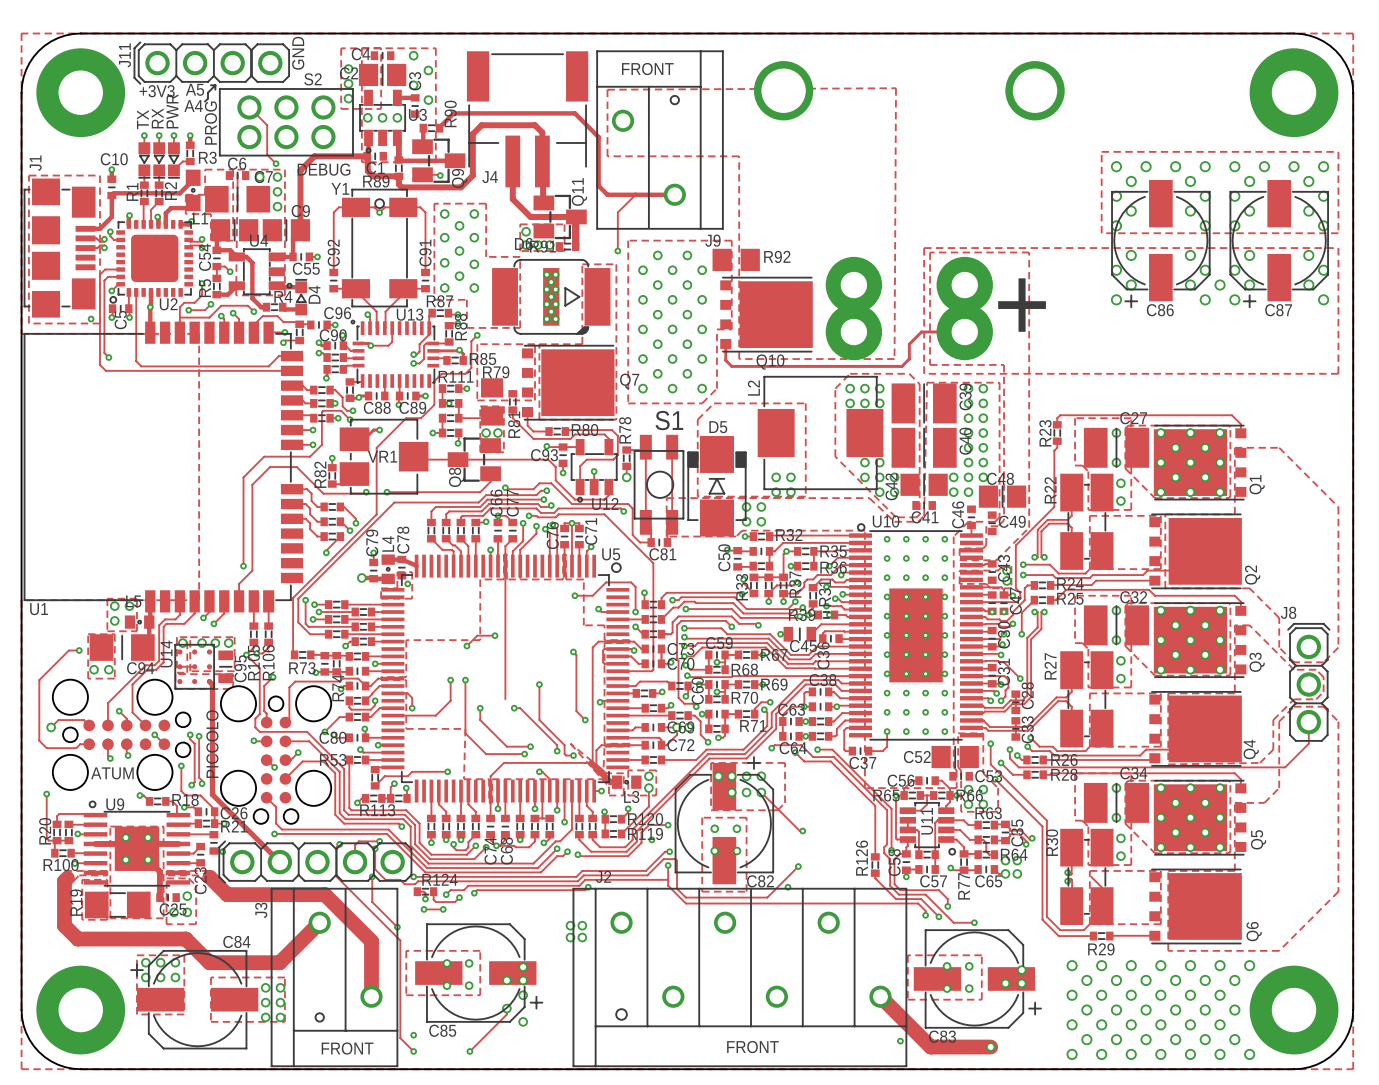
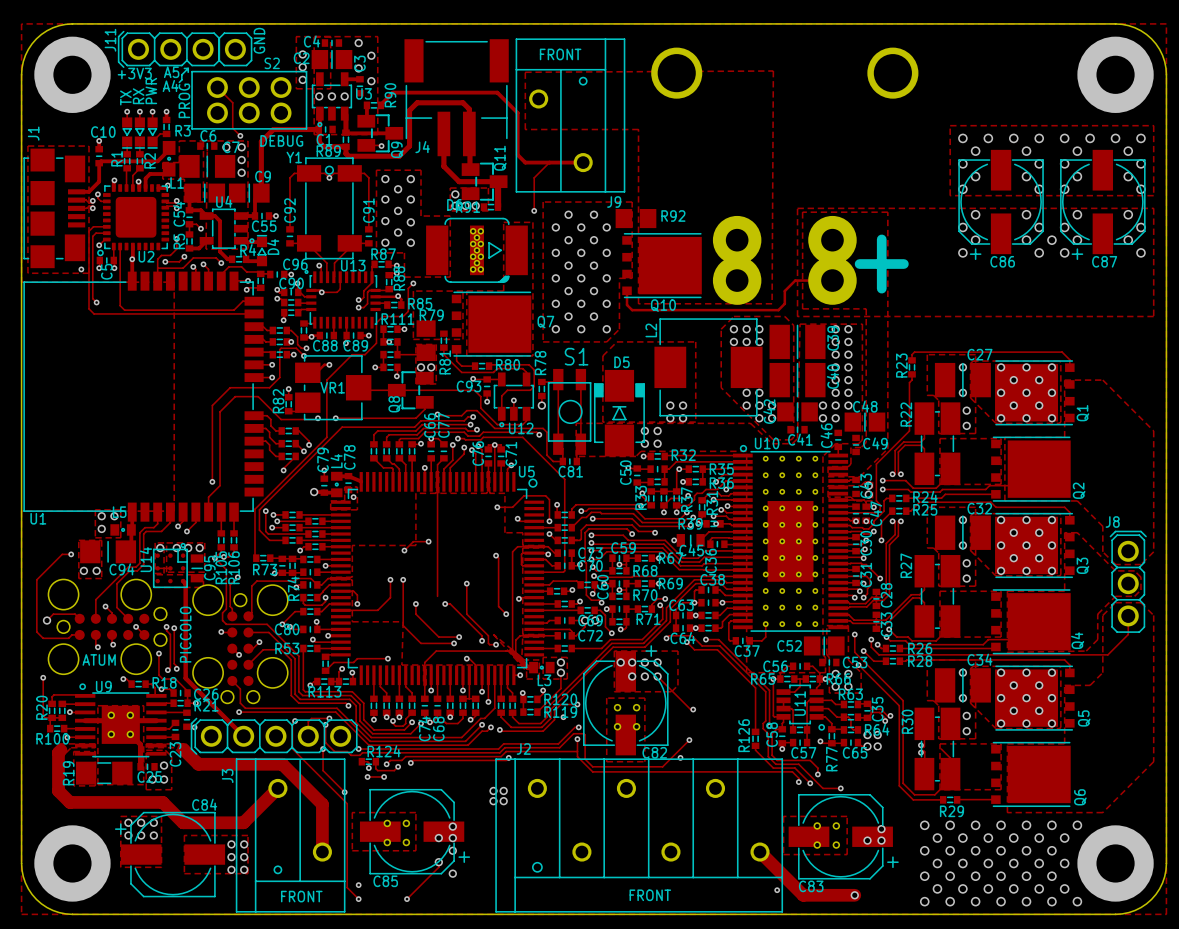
U14 footprint: [174, 643, 216, 690] -> [152, 542, 188, 589]

